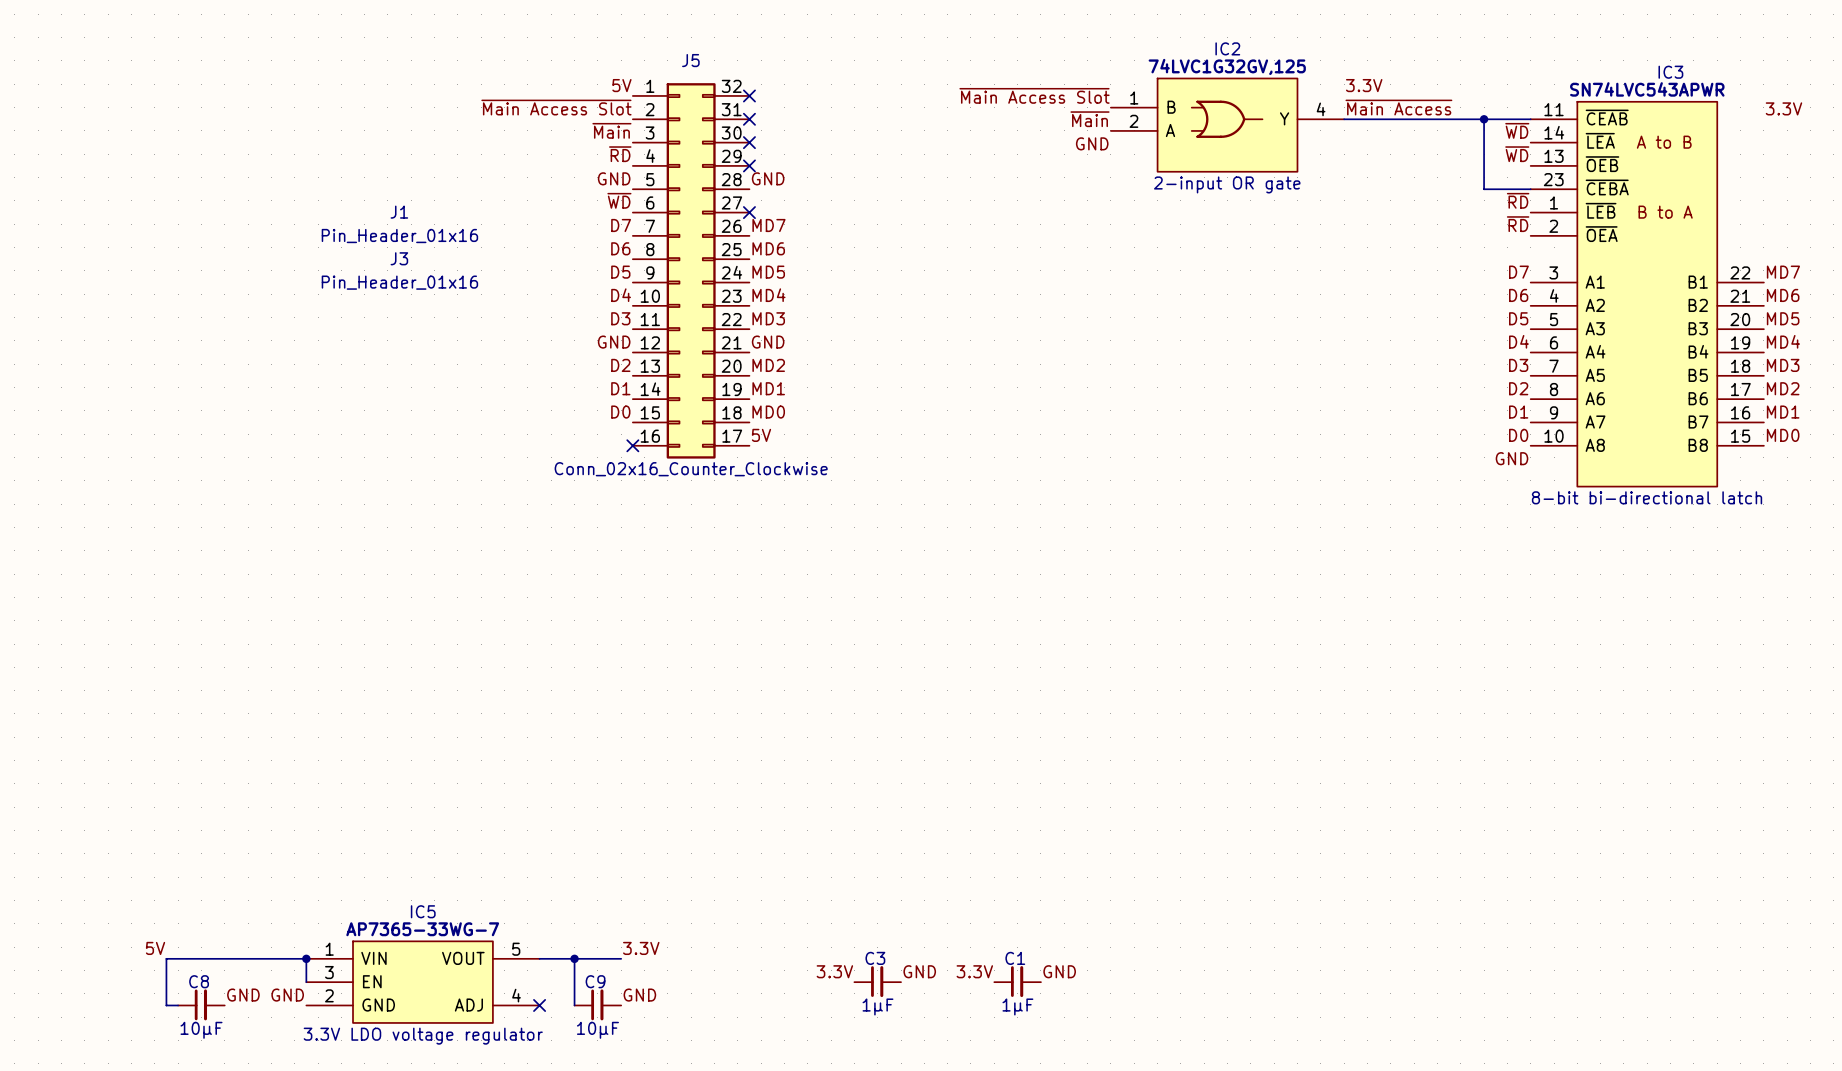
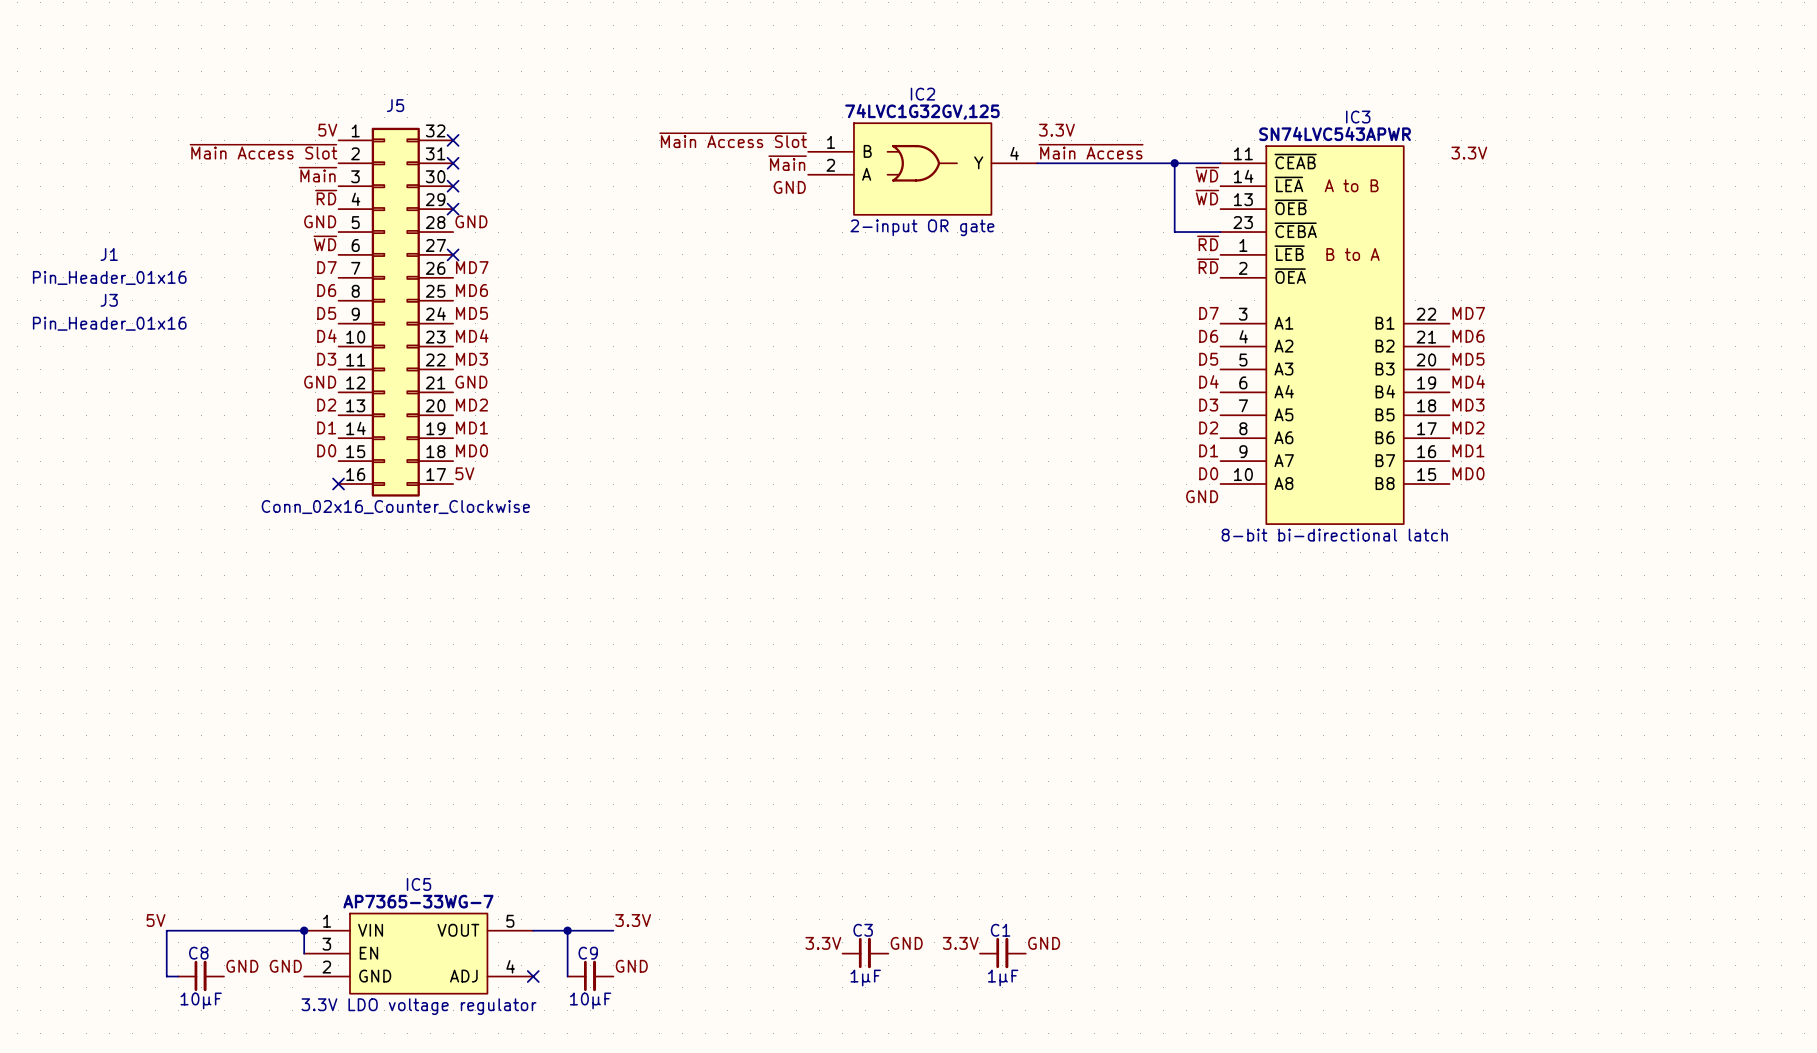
label: 5V (621, 85) -> none
label: 3.3V (1364, 85) -> none
no-connect mark: (749, 95) -> none
label: ~{Main Access Slot} (1034, 95) -> none
label: ~{Main Access Slot} (556, 107) -> none
label: ~{Main Access} (1398, 107) -> none
label: 3.3V (1783, 108) -> none
no-connect mark: (749, 119) -> none
label: ~{Main} (1090, 119) -> none
wire: (1344, 119) (1530, 119) -> none
wire: (1484, 119) (1484, 189) (1530, 189) -> none
junction: (1484, 119) -> none
IC2 position: (1227, 125) -> (922, 169)
label: ~{Main} (611, 130) -> none
label: ~{WD} (1517, 130) -> none
no-connect mark: (749, 142) -> none
label: none -> 5V (327, 130)
label: none -> 3.3V (1056, 130)
label: GND (1092, 143) -> none
no-connect mark: none -> (453, 140)
label: ~{RD} (620, 154) -> none
label: none -> ~{Main Access Slot} (733, 140)
label: ~{WD} (1517, 154) -> none
label: none -> ~{Main Access Slot} (263, 151)
no-connect mark: (749, 165) -> none
label: none -> ~{Main Access} (1091, 151)
label: none -> 3.3V (1469, 153)
no-connect mark: none -> (453, 163)
label: none -> ~{Main} (787, 163)
wire: none -> (1037, 163) (1220, 163)
wire: none -> (1174, 163) (1174, 232) (1220, 232)
junction: none -> (1174, 163)
label: GND (614, 178) -> none
label position: GND (768, 178) -> GND (789, 187)
label: none -> ~{Main} (318, 174)
label: none -> ~{WD} (1207, 174)
no-connect mark: none -> (453, 186)
label: ~{WD} (619, 200) -> none
label: ~{RD} (1518, 200) -> none
label: none -> ~{RD} (326, 197)
no-connect mark: (749, 212) -> none
label: none -> ~{WD} (1207, 197)
J1 position: (399, 224) -> (109, 266)
no-connect mark: none -> (453, 209)
label: ~{RD} (1518, 224) -> none
label: D7 (621, 225) -> none
label: MD7 (768, 225) -> none
label: none -> GND (320, 221)
label: none -> GND (471, 221)
label: D6 (620, 248) -> none
label: MD6 (768, 248) -> none
label: none -> ~{WD} (325, 243)
label: none -> ~{RD} (1208, 243)
J3 position: (399, 270) -> (109, 312)
no-connect mark: none -> (453, 254)
J5 position: (691, 270) -> (395, 312)
label: D5 (620, 272) -> none
label: MD5 (768, 272) -> none
label: D7 (1518, 272) -> none
label: MD7 (1783, 272) -> none
label: none -> ~{RD} (1208, 266)
label: none -> D7 (327, 267)
label: none -> MD7 (472, 267)
IC3 position: (1647, 294) -> (1335, 335)
label: D4 (621, 295) -> none
label: MD4 (768, 295) -> none
label: D6 (1518, 295) -> none
label: MD6 (1783, 295) -> none
label: none -> D6 (326, 290)
label: none -> MD6 (471, 290)
label: D3 (620, 318) -> none
label: MD3 (768, 318) -> none
label: D5 (1518, 318) -> none
label: MD5 (1783, 318) -> none
label: none -> D5 (326, 313)
label: none -> MD5 (471, 313)
label: none -> D7 (1208, 313)
label: none -> MD7 (1468, 313)
label: D4 (1518, 341) -> none
label: MD4 (1783, 341) -> none
label: GND (614, 342) -> none
label: GND (768, 342) -> none
label: none -> D4 (327, 336)
label: none -> MD4 (472, 336)
label: none -> D6 (1208, 336)
label: none -> MD6 (1468, 336)
label: D2 (620, 365) -> none
label: MD2 (768, 365) -> none
label: D3 (1518, 365) -> none
label: MD3 (1783, 365) -> none
label: none -> D3 (326, 359)
label: none -> MD3 (471, 359)
label: none -> D5 (1208, 359)
label: none -> MD5 (1468, 359)
label: D1 (620, 388) -> none
label: MD1 (768, 388) -> none
label: D2 (1518, 388) -> none
label: MD2 (1783, 388) -> none
label: none -> GND (320, 382)
label: none -> GND (471, 382)
label: none -> D4 (1208, 381)
label: none -> MD4 (1468, 381)
label: D0 (620, 412) -> none
label: MD0 (768, 412) -> none
label: D1 (1518, 412) -> none
label: MD1 (1783, 412) -> none
label: none -> D2 (326, 405)
label: none -> MD2 (471, 405)
label: none -> D3 (1208, 405)
label: none -> MD3 (1468, 405)
label: 5V (761, 435) -> none
label: D0 (1518, 435) -> none
label: MD0 (1783, 435) -> none
no-connect mark: (632, 445) -> none
label: none -> D1 (326, 427)
label: none -> MD1 (471, 427)
label: none -> D2 (1208, 427)
label: none -> MD2 (1468, 427)
label: GND (1512, 458) -> none
label: none -> D0 (326, 450)
label: none -> MD0 (471, 450)
label: none -> D1 (1208, 450)
label: none -> MD1 (1468, 450)
label: none -> 5V (464, 473)
label: none -> D0 (1208, 473)
label: none -> MD0 (1468, 473)
no-connect mark: none -> (338, 484)
label: none -> GND (1202, 496)

